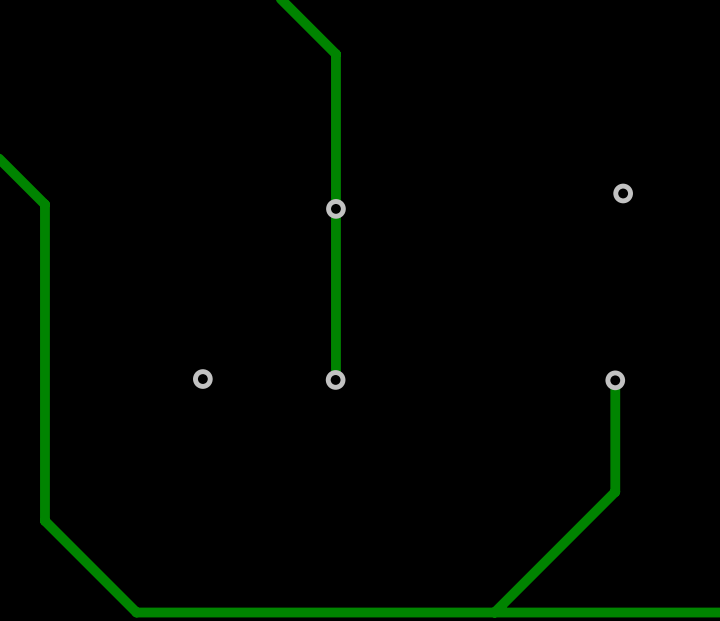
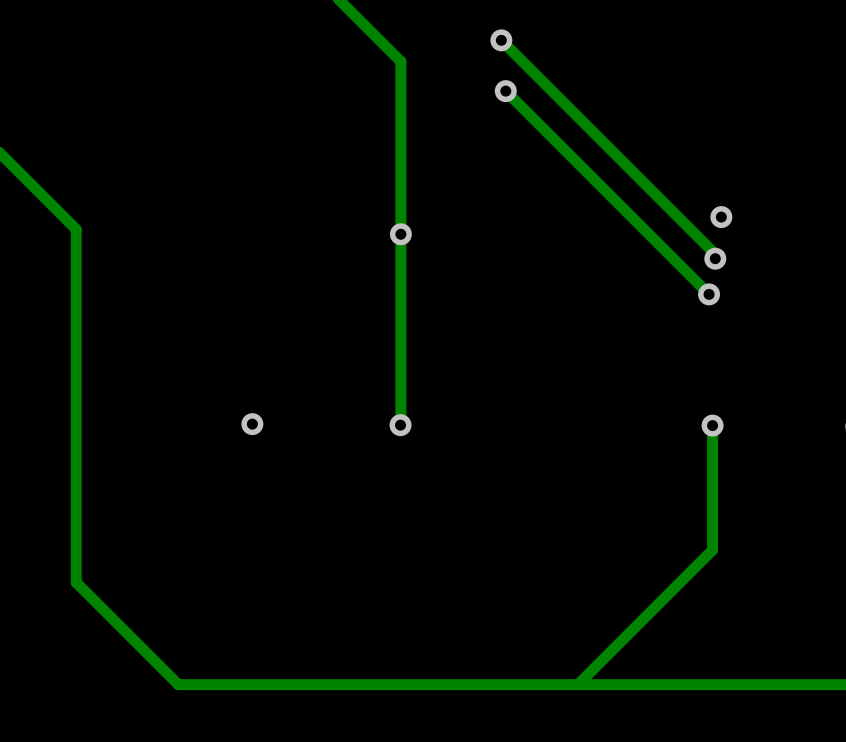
track: none -> (501, 40) (715, 254) (715, 258)
via: none -> (501, 40)
track: none -> (505, 91) (709, 294)
via: none -> (505, 91)
via: none -> (715, 258)
via: none -> (709, 294)

